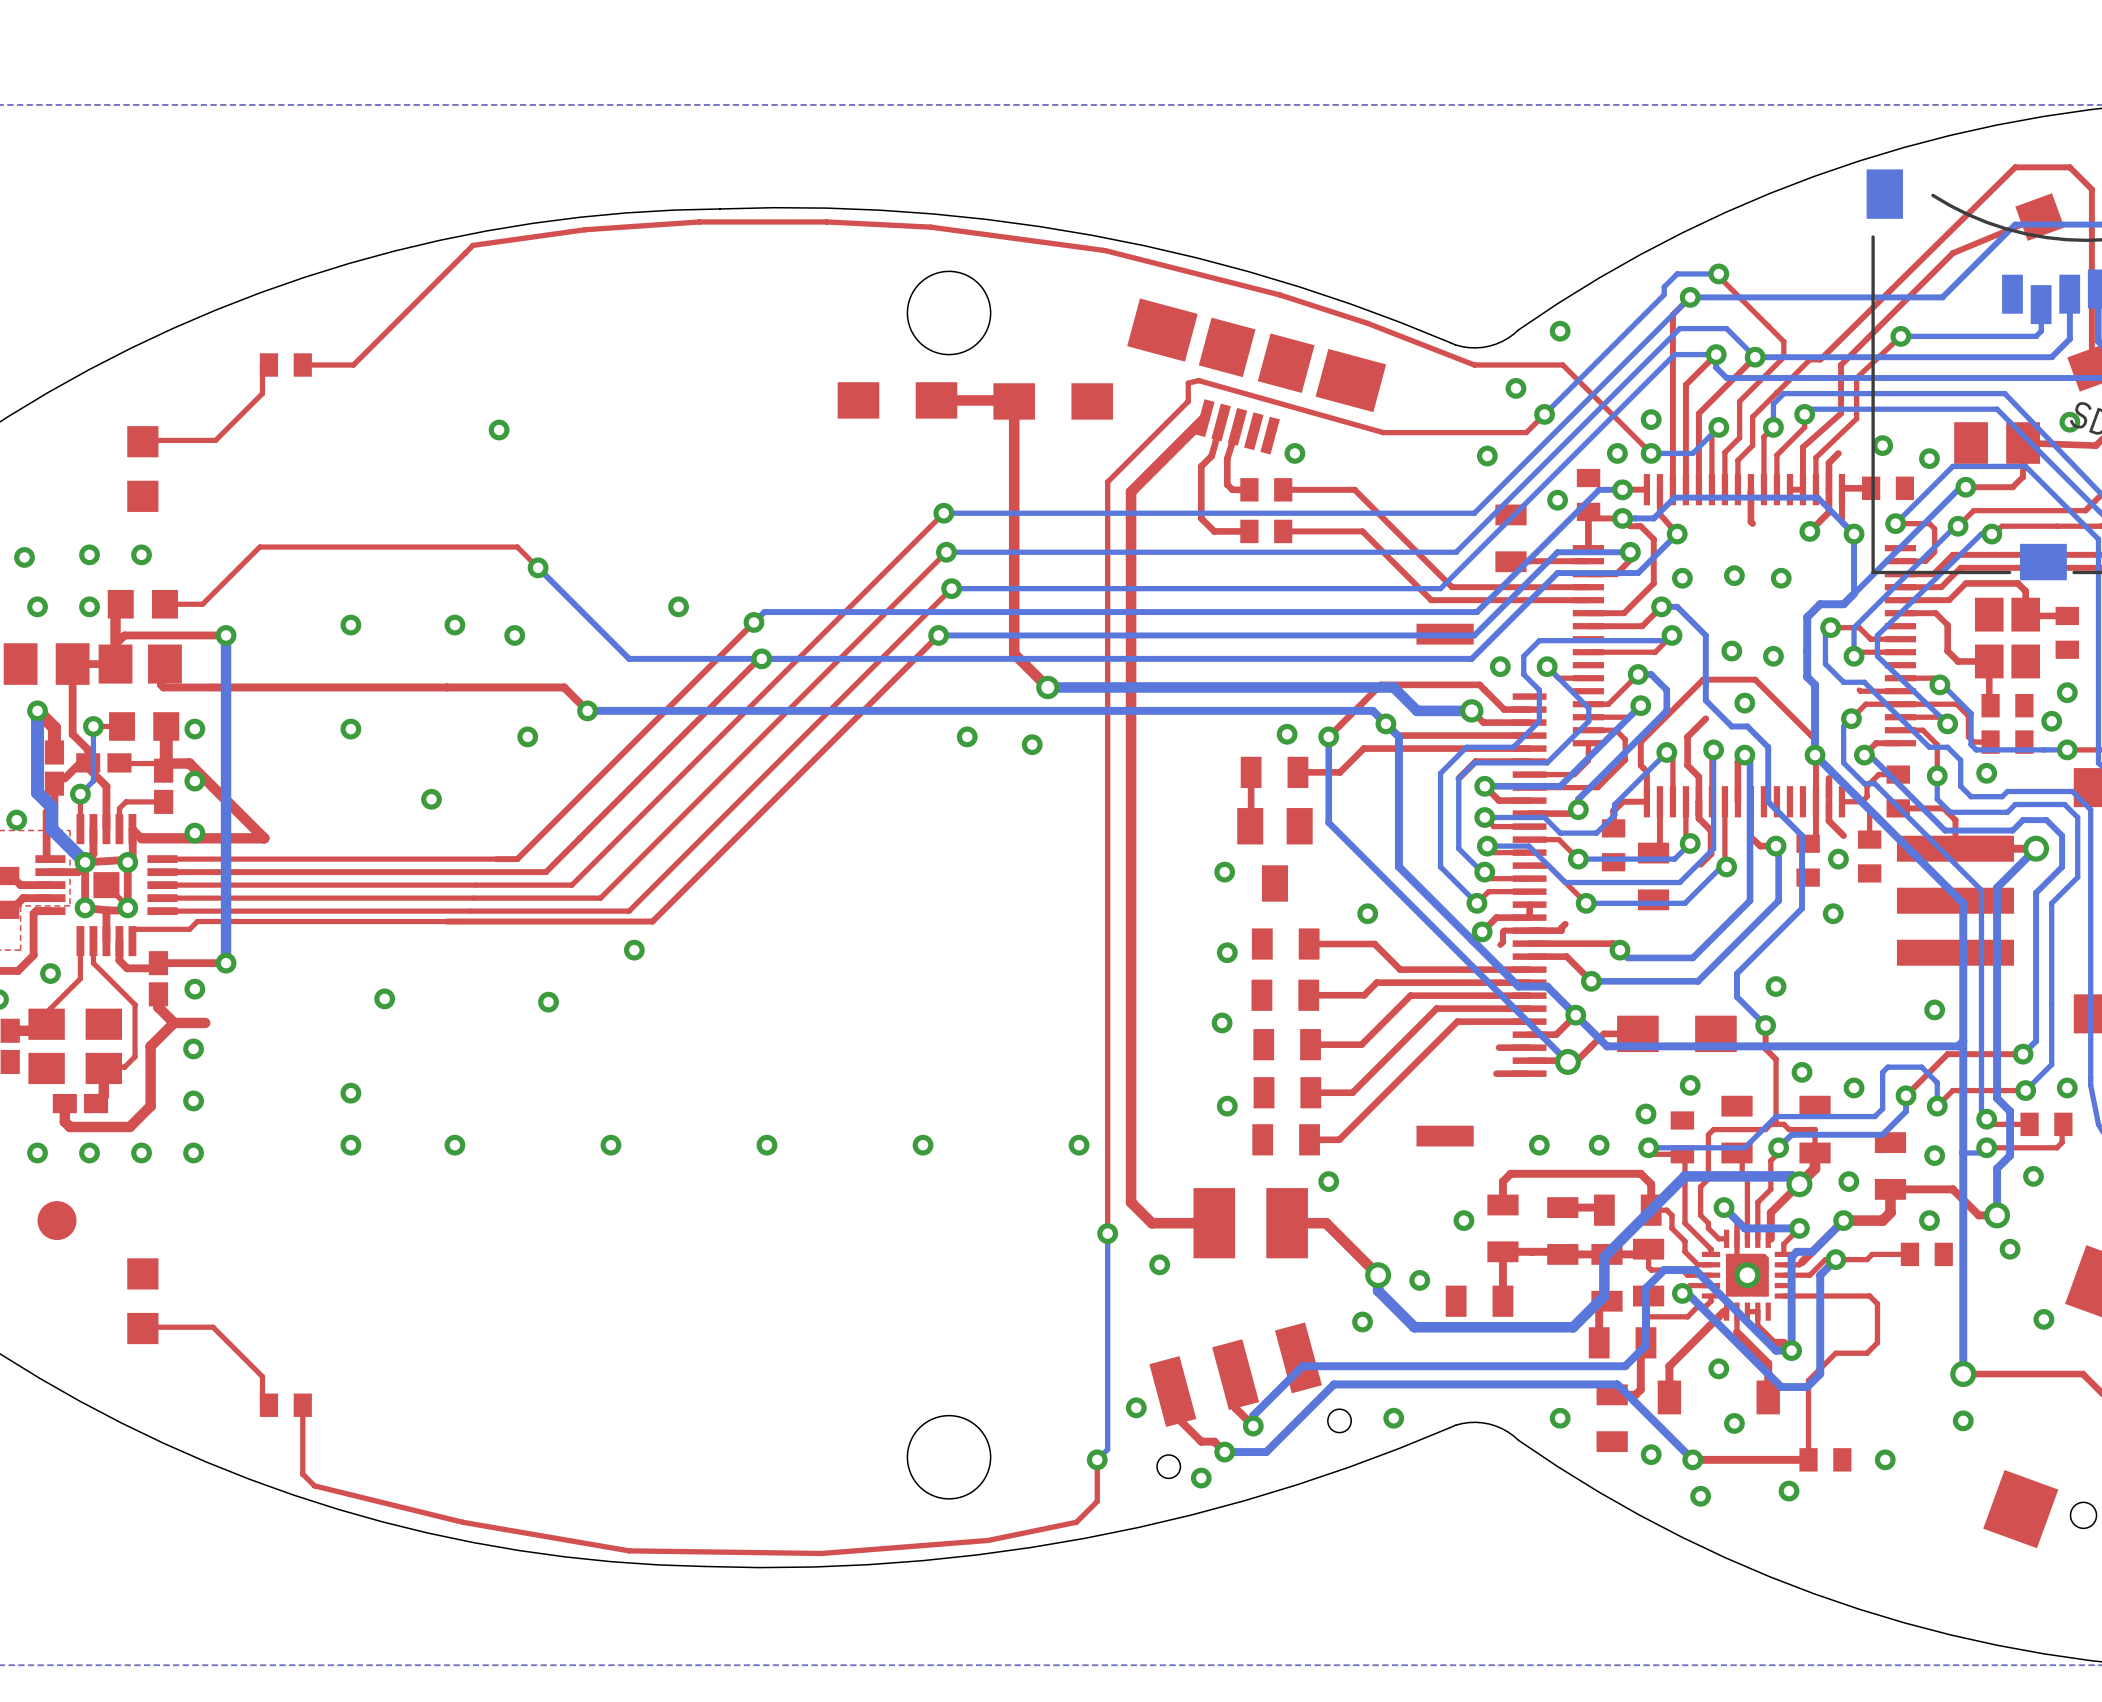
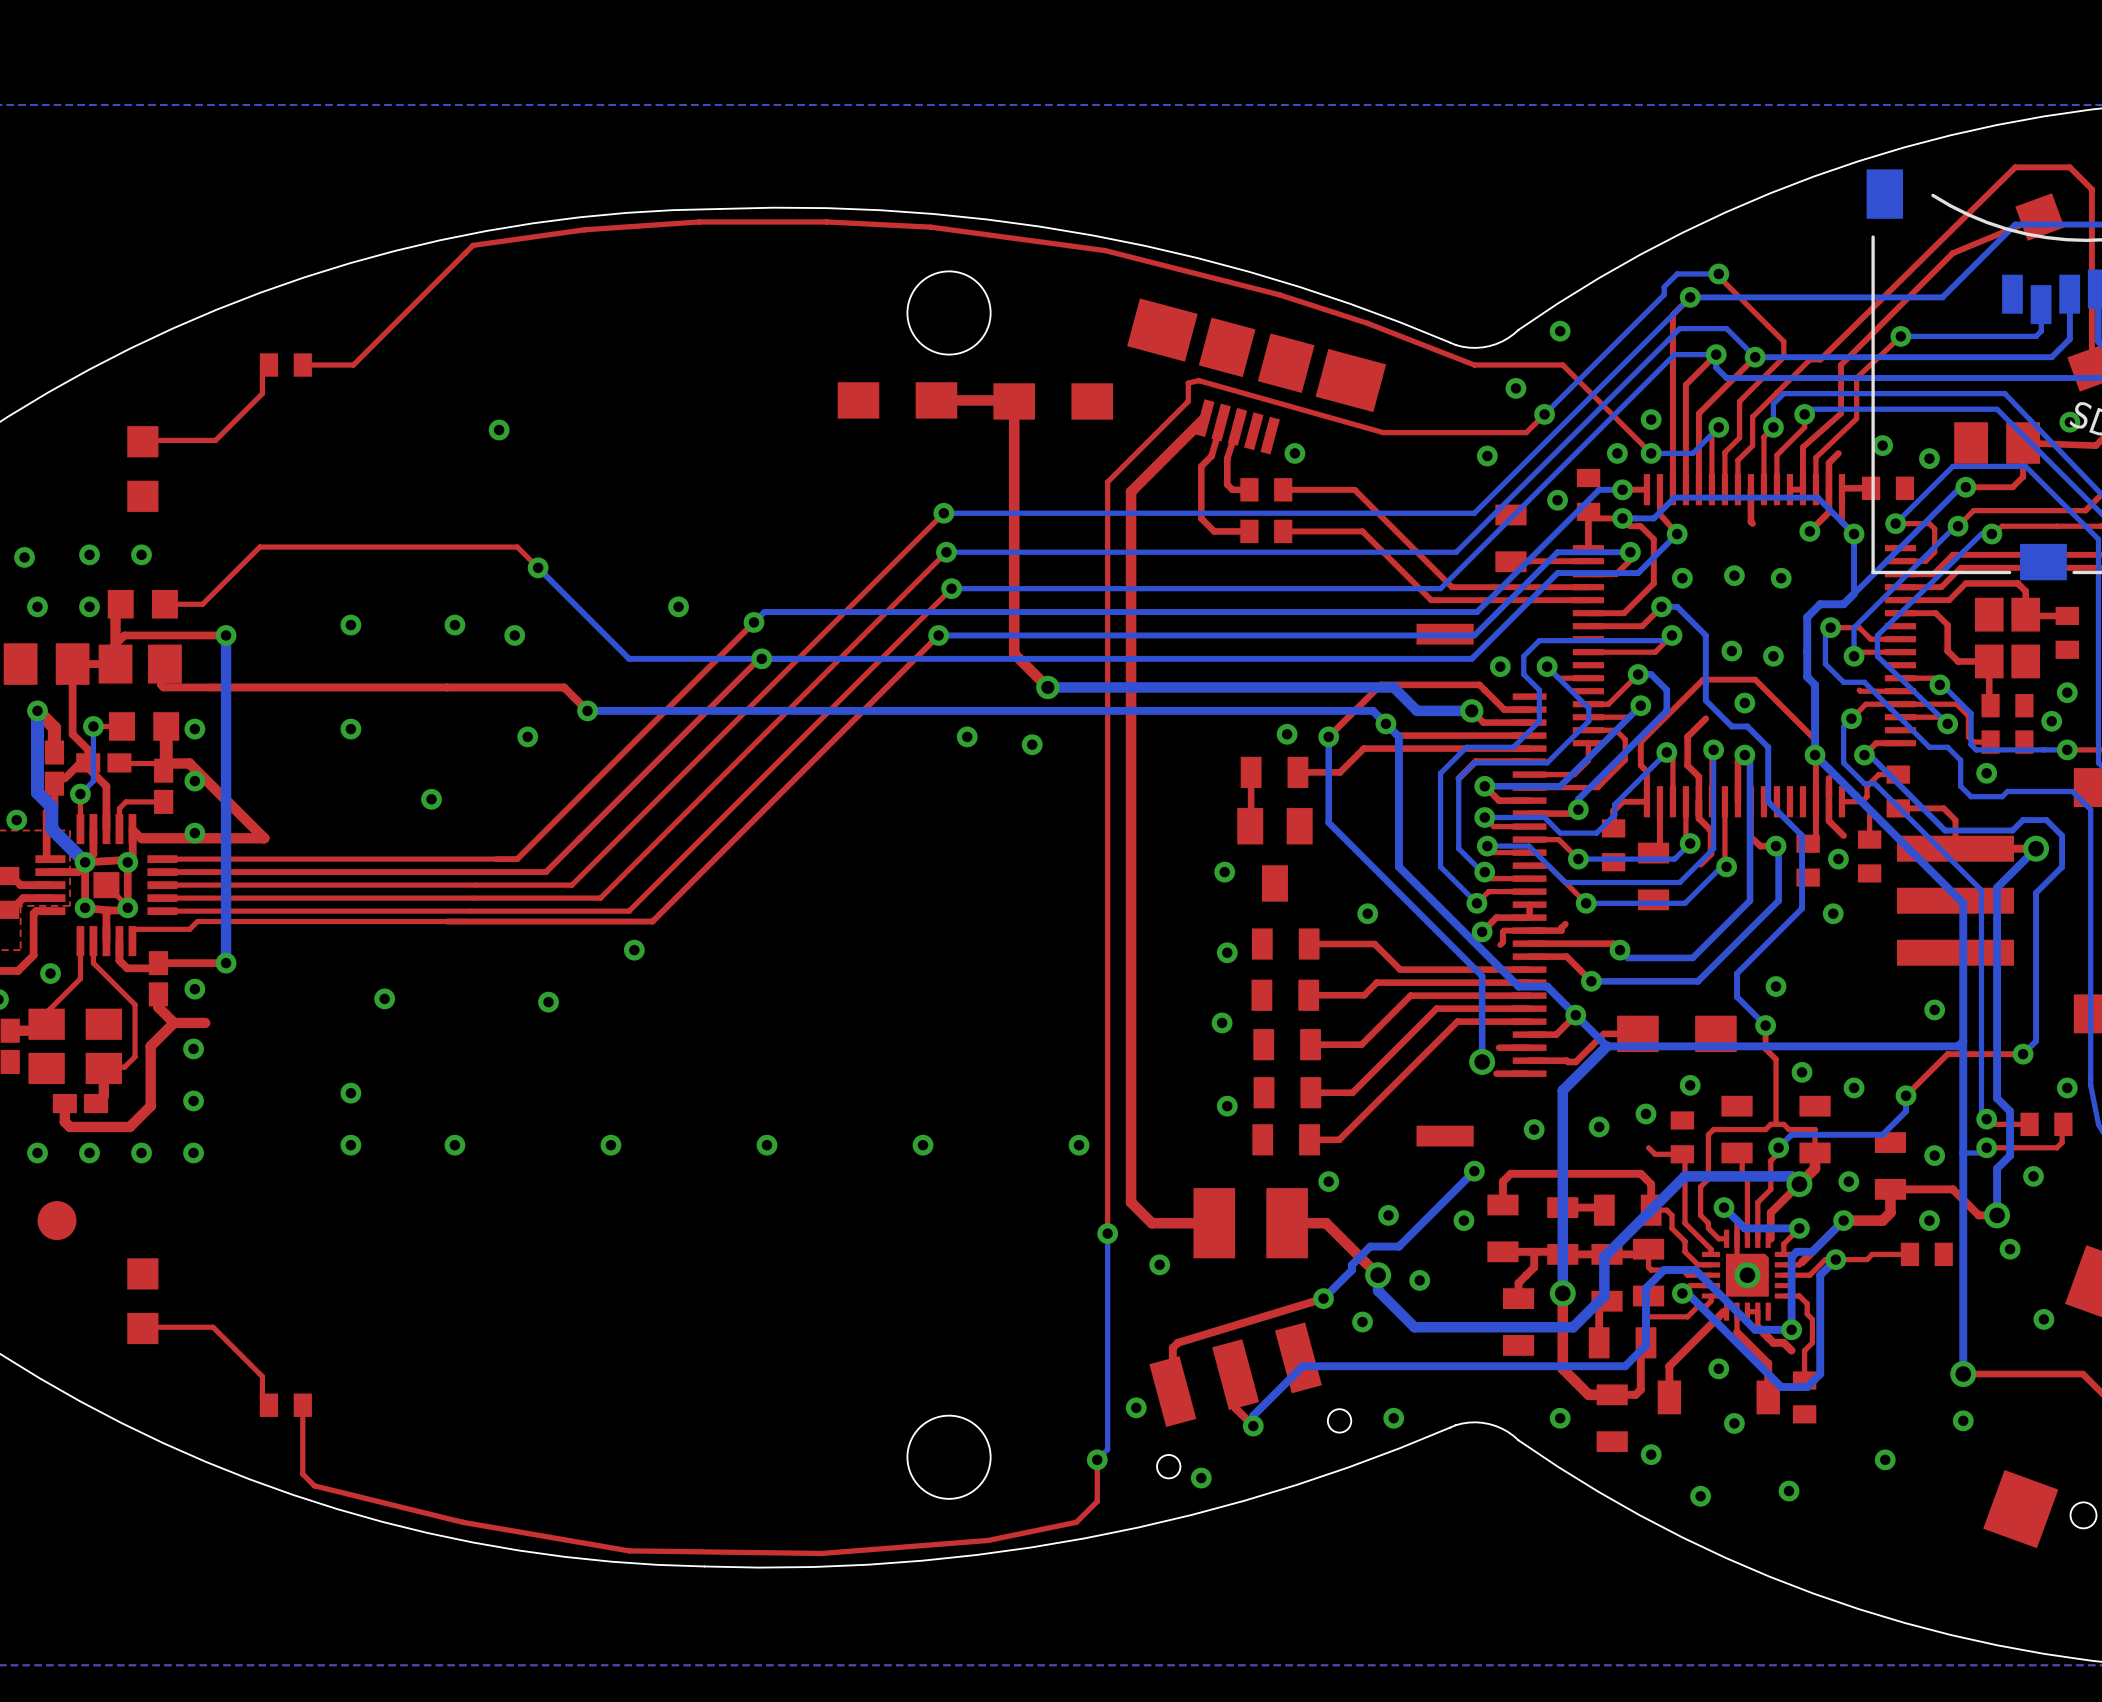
top track: (1900, 730) (1922, 730) (1937, 744) (1937, 775) -> none
bottom track: (1937, 775) (1937, 799) (1950, 812) (2007, 812) (2015, 804) (2064, 804) (2077, 817) (2077, 877) (2051, 903) (2051, 1064) (2025, 1090) -> none
via: (1937, 775) -> none
bottom track: (1482, 976) (1567, 1061) -> (1482, 976) (1482, 1061)
bottom track: none -> (1606, 1046) (1562, 1090) (1562, 1293)
via position: (1567, 1061) -> (1482, 1061)
top track: (2025, 1090) (1952, 1090) (1937, 1106) -> none
via: (2025, 1090) -> none
bottom track: (1937, 1106) (1937, 1082) (1921, 1067) (1887, 1067) (1882, 1072) (1882, 1108) (1874, 1116) (1776, 1116) (1744, 1147) (1648, 1147) -> none
via: (1937, 1106) -> none
via position: (1539, 1145) -> (1534, 1129)
via position: (1599, 1145) -> (1599, 1126)
via: (1648, 1147) -> none
bottom track: none -> (1474, 1171) (1398, 1246) (1370, 1246) (1352, 1264) (1352, 1270) (1323, 1298)
via: none -> (1474, 1171)
via: none -> (1388, 1215)
top track: (1502, 1251) (1502, 1301) -> none
top track: none -> (1534, 1251) (1534, 1267) (1518, 1283) (1518, 1298)
top track: none -> (1562, 1293) (1562, 1368) (1588, 1394) (1612, 1394)
via: none -> (1562, 1293)
top track: (1799, 1296) (1869, 1296) (1877, 1303) (1877, 1342) (1867, 1353) (1835, 1353) (1808, 1380) (1808, 1459) (1692, 1459) -> (1799, 1296) (1807, 1303) (1807, 1314) (1812, 1319) (1812, 1342) (1804, 1350) (1804, 1380)
top track: none -> (1323, 1298) (1177, 1342) (1172, 1347) (1172, 1391)
via: none -> (1323, 1298)
part rotation: 0° (1479, 1301) -> 90° clockwise (1518, 1322)
part position: (1479, 1301) -> (1518, 1322)
bottom track: (1791, 1329) (1791, 1350) (1776, 1350) (1755, 1329) -> (1791, 1329) (1755, 1329)
via position: (1791, 1350) -> (1791, 1329)
top track: (1172, 1413) (1201, 1441) (1214, 1441) (1224, 1452) -> none
bottom track: (1224, 1452) (1266, 1452) (1333, 1384) (1617, 1384) (1692, 1459) -> none
via: (1224, 1452) -> none
via: (1692, 1459) -> none
part rotation: 0° (1825, 1459) -> 90° clockwise (1804, 1397)
part position: (1825, 1459) -> (1804, 1397)

